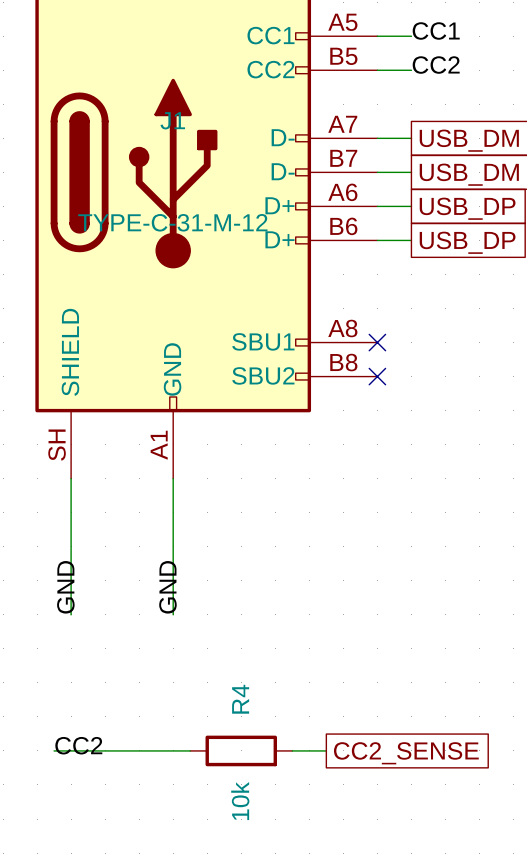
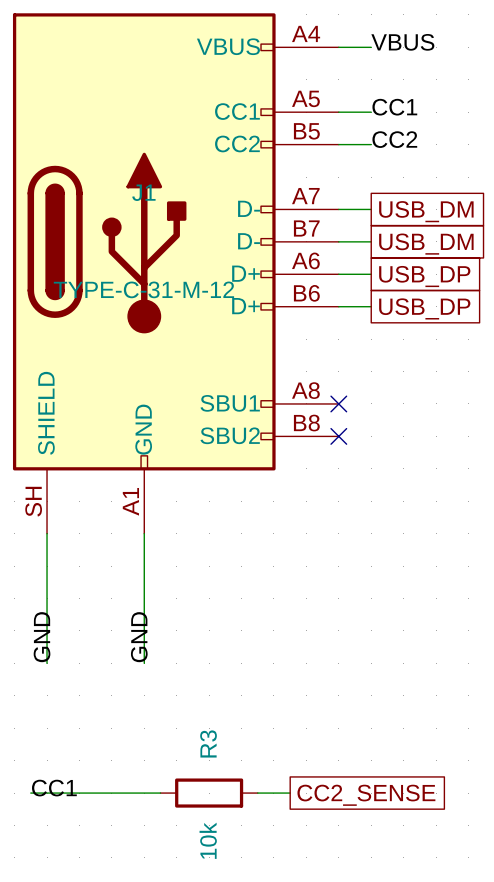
R4 name: R4 (240, 699) -> R3 (208, 743)
label: CC2 (78, 745) -> CC1 (54, 788)

